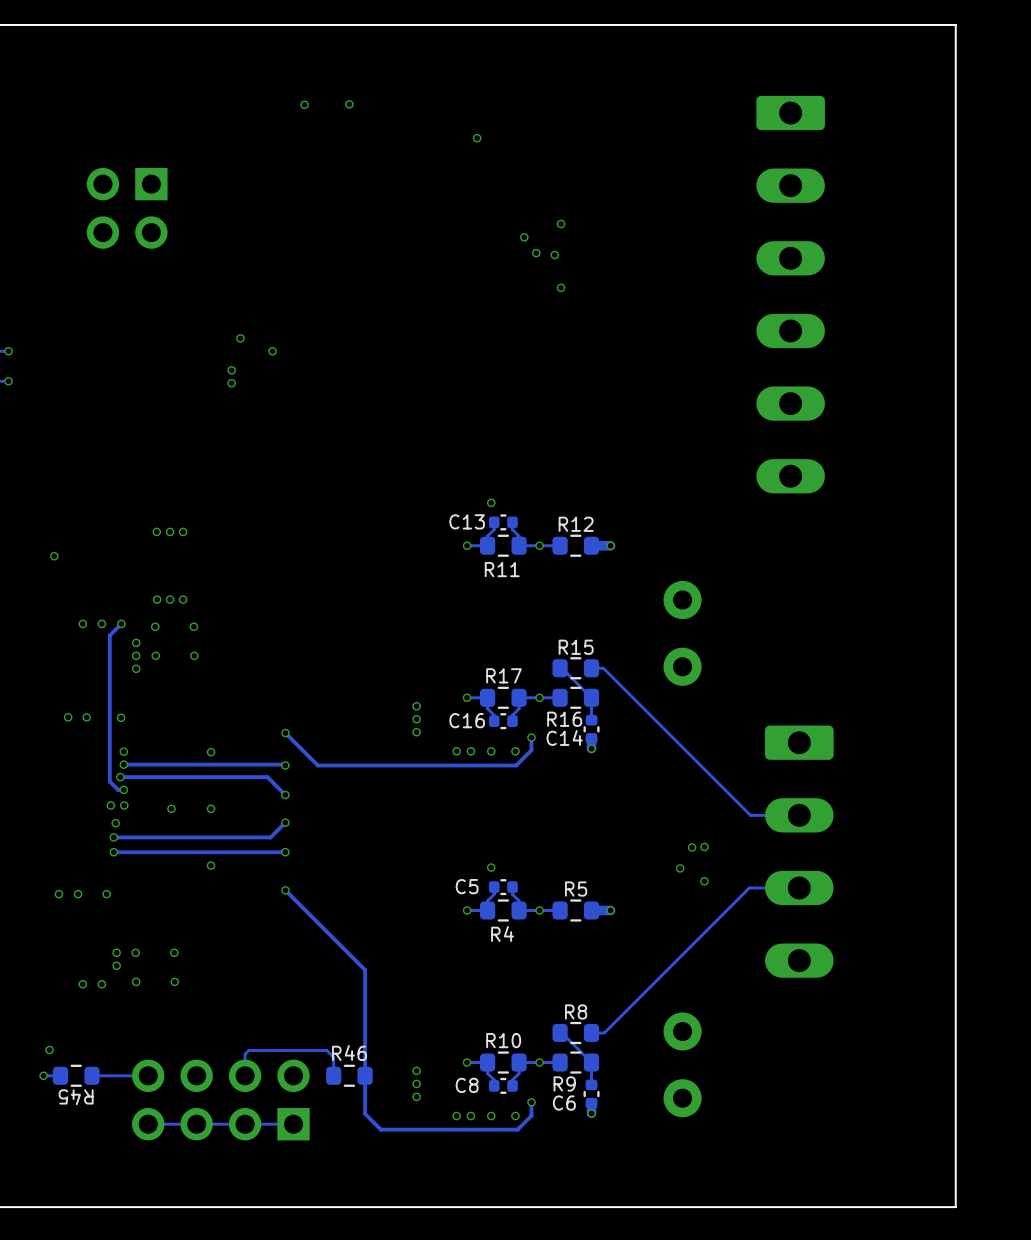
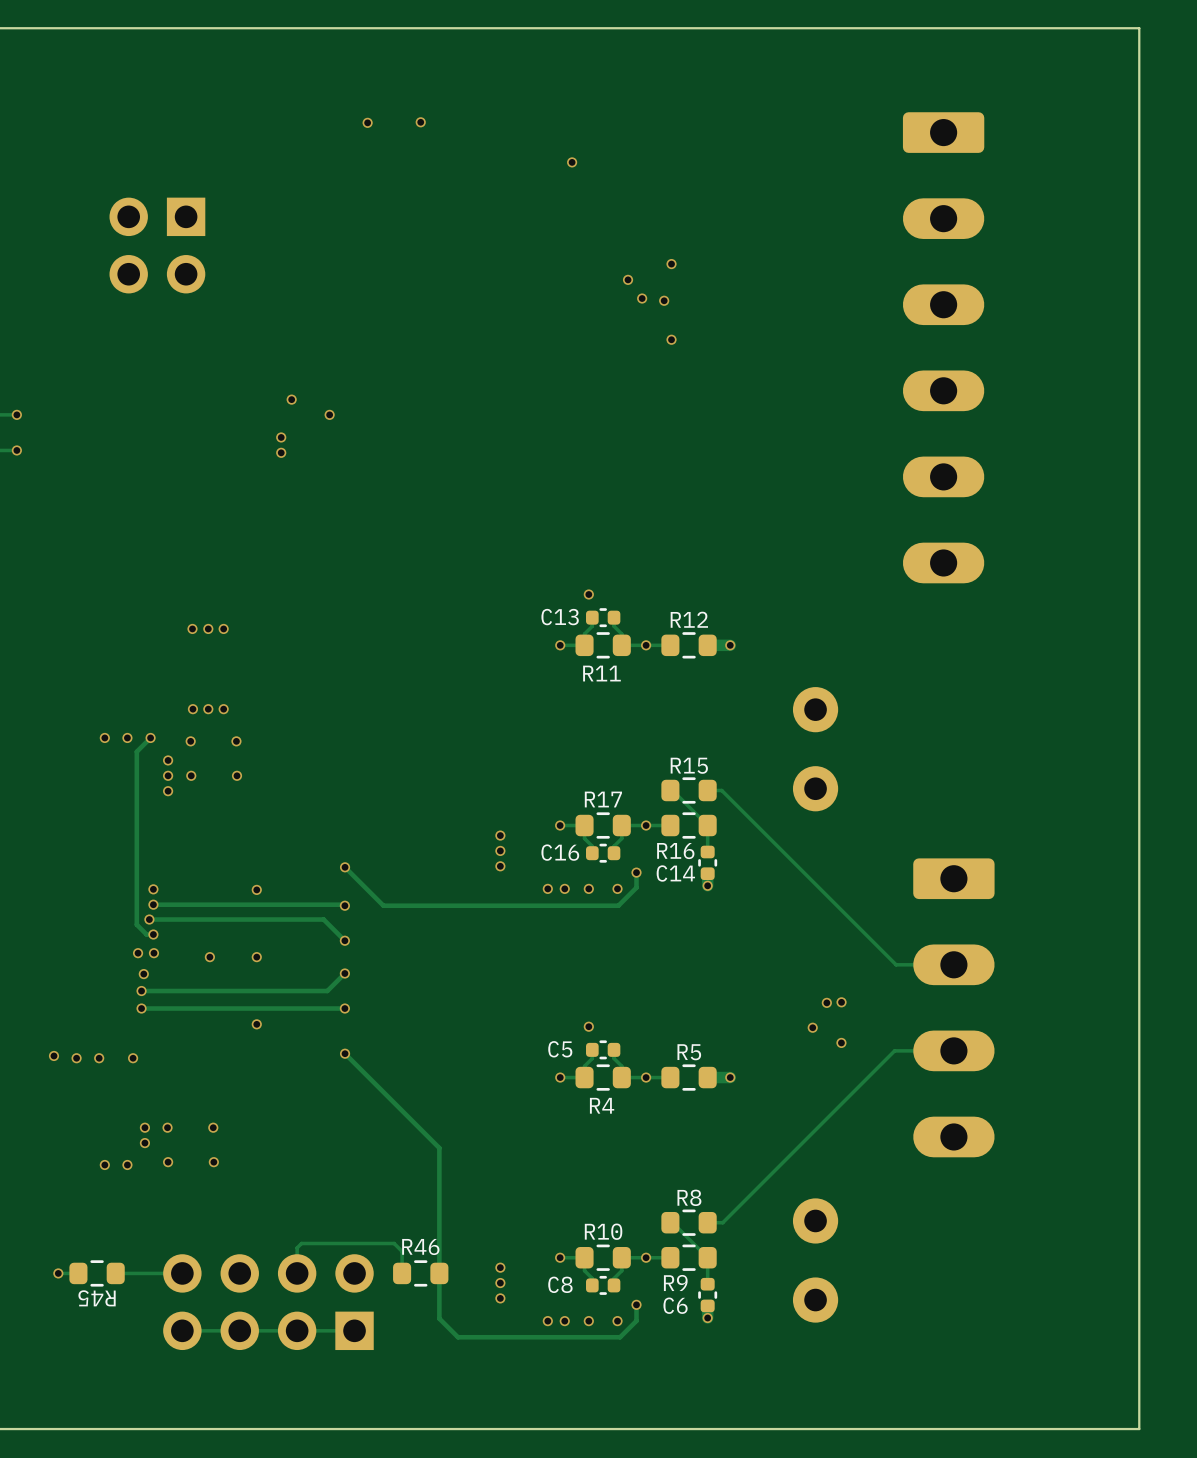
via: (54, 556) -> none
via: (68, 717) -> none
via: (86, 717) -> none
via: (121, 717) -> none
via: none -> (54, 1055)
via: (49, 1050) -> none

